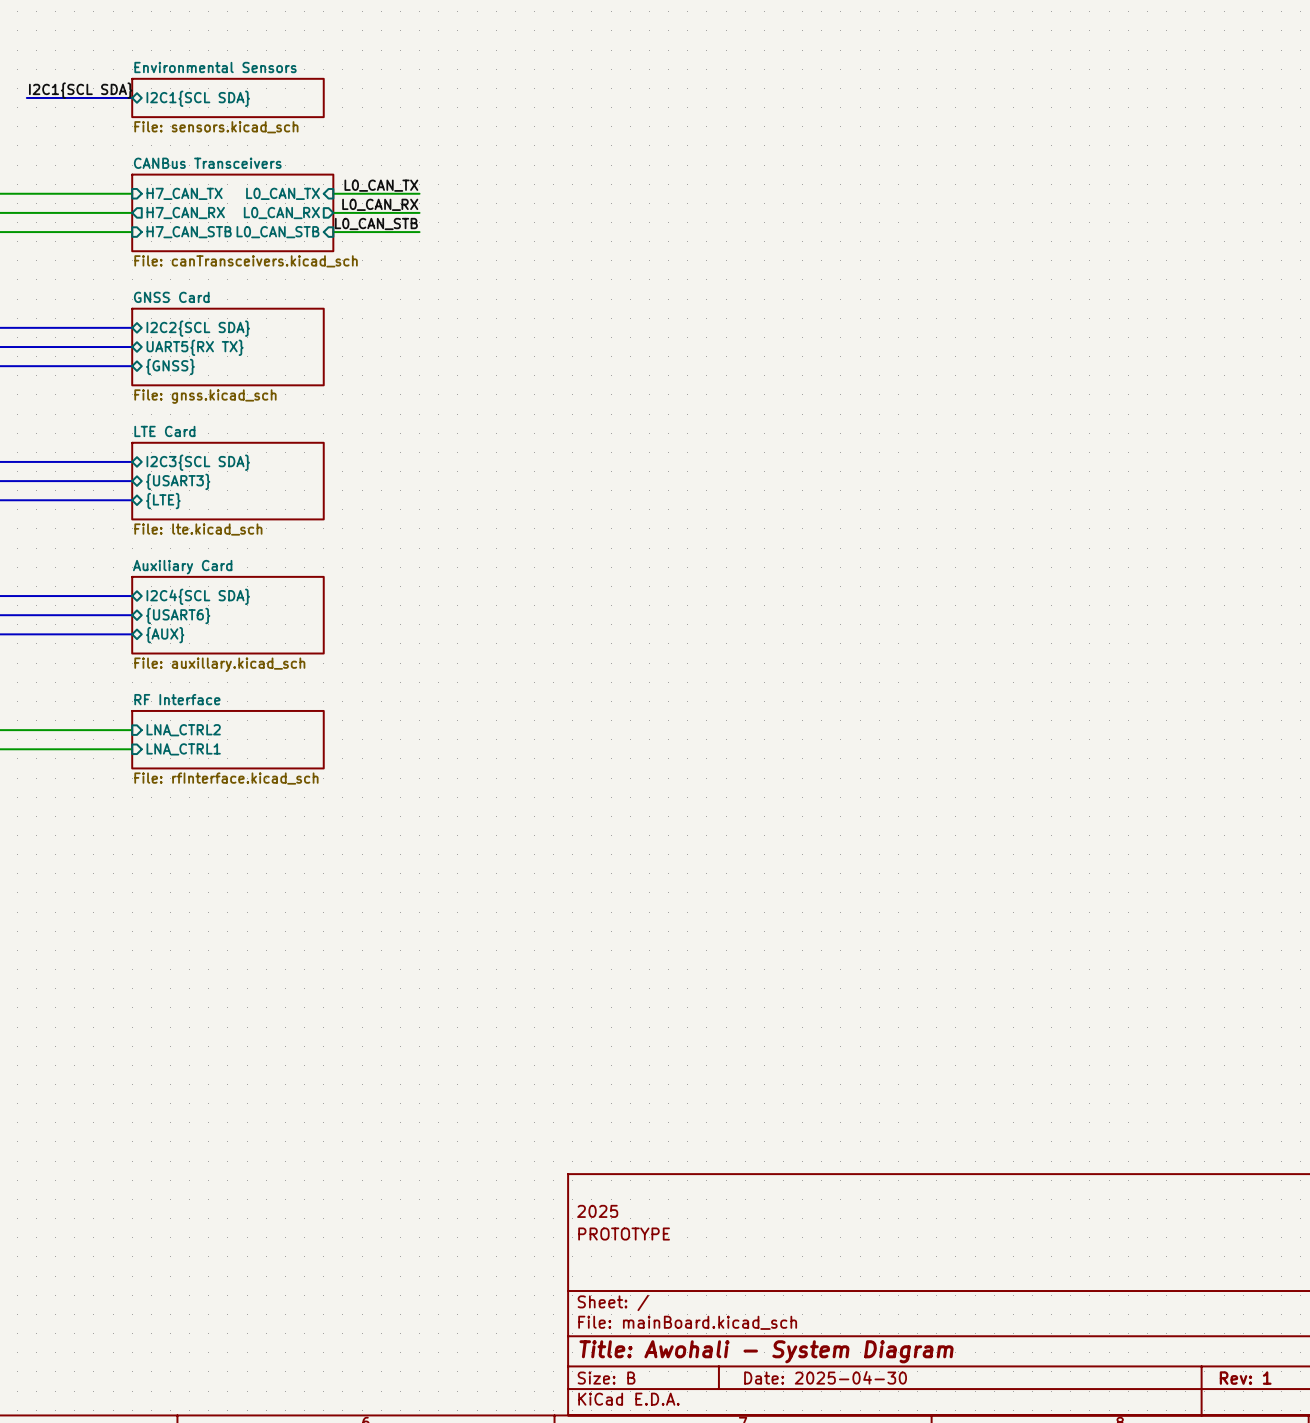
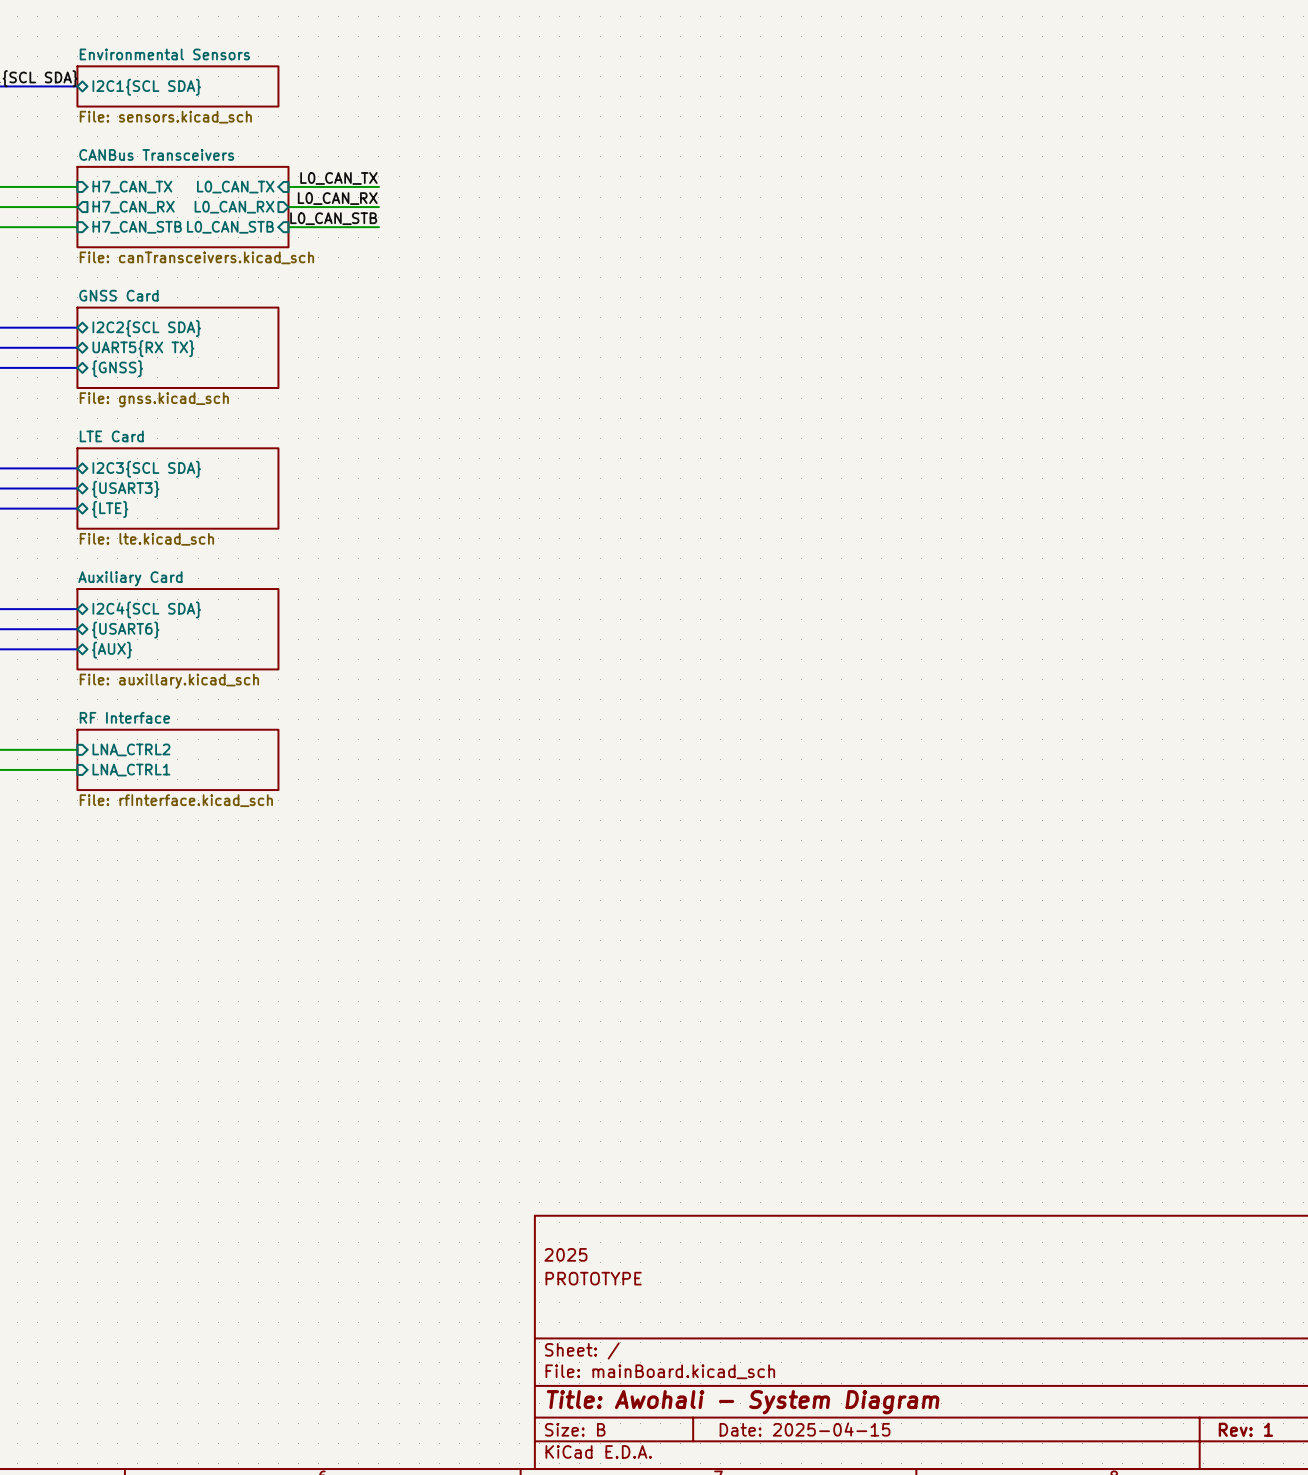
title block: Date: 2025-04-30 (825, 1377) -> Date: 2025-04-15 (805, 1429)

